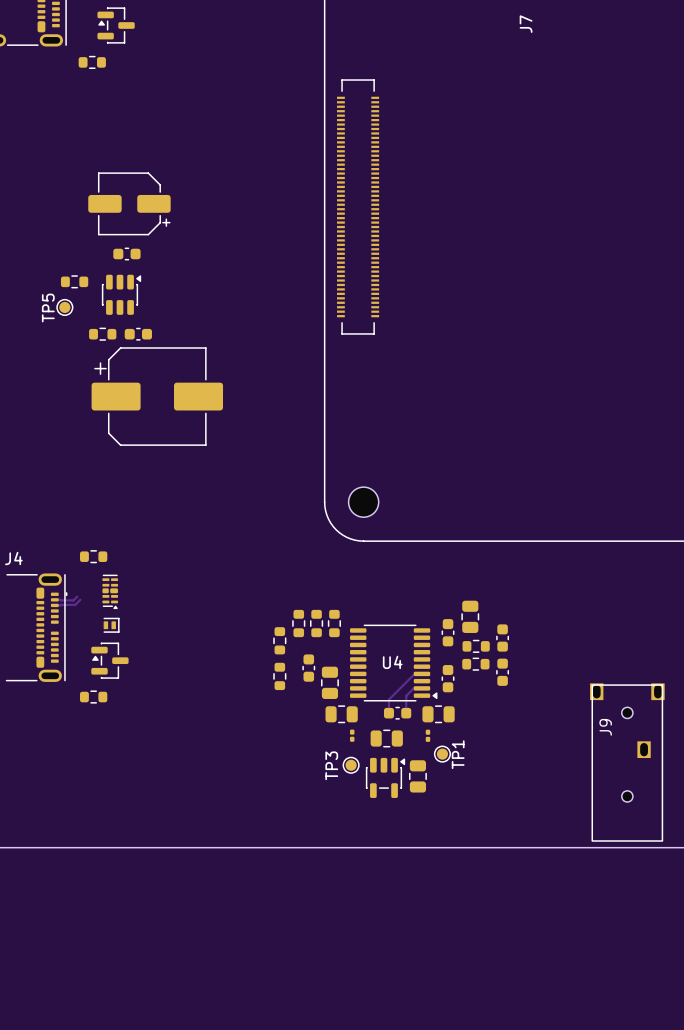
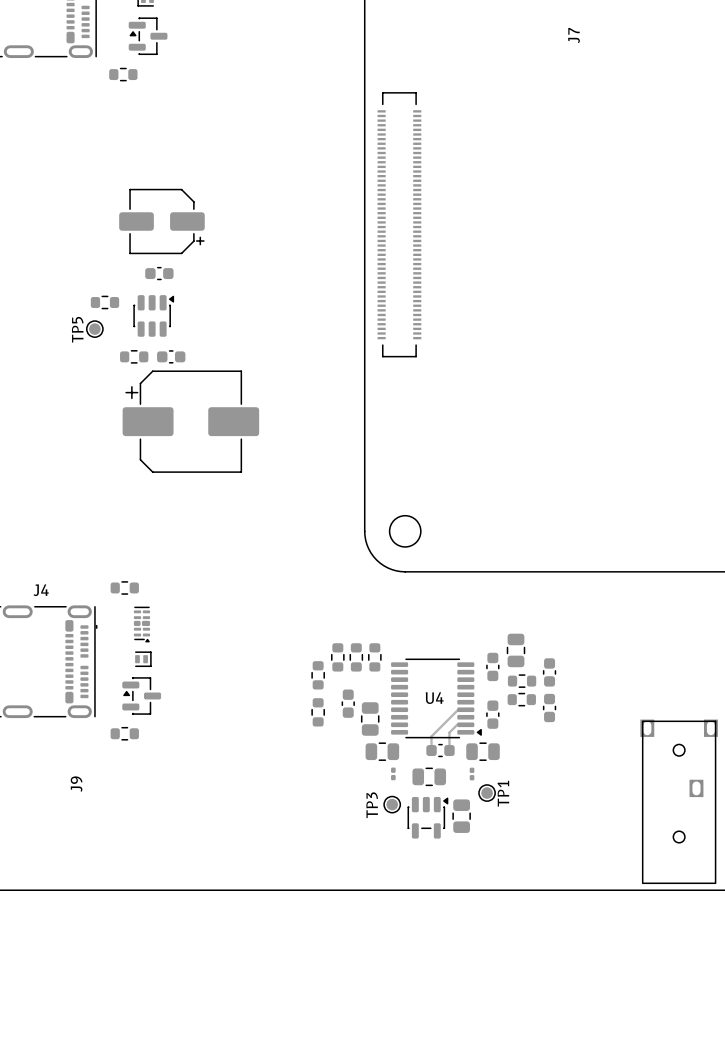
track: (77, 596) (73, 600) (54, 599) -> none
track: (80, 599) (75, 604) (54, 605) -> none
J9 name position: J9 (605, 727) -> J9 (76, 784)

